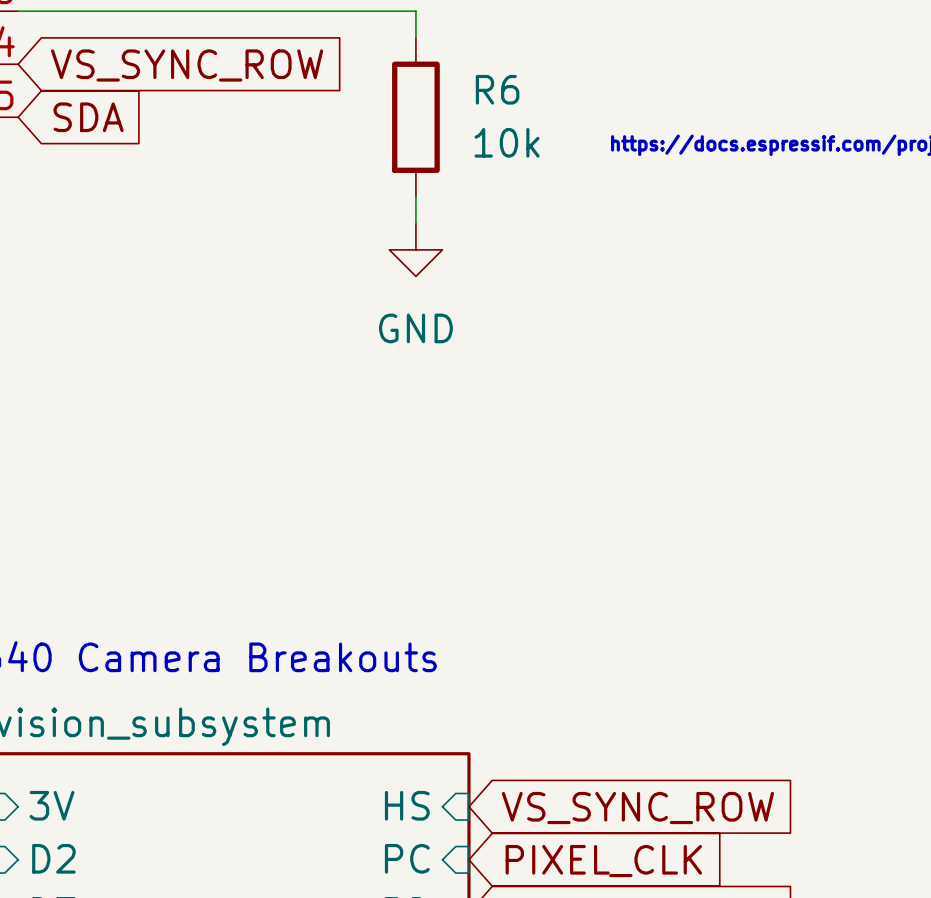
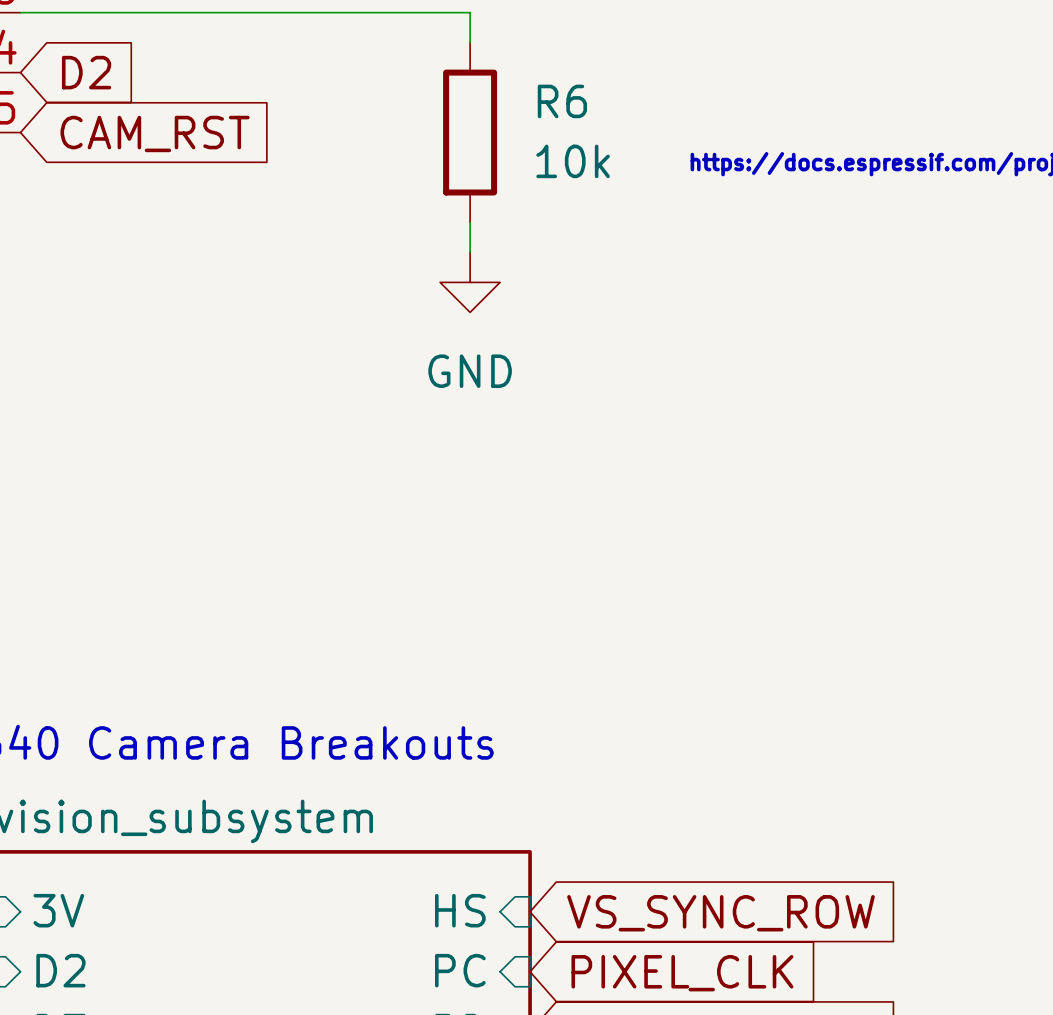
global label: VS_SYNC_ROW (187, 65) -> D2 (86, 72)
global label: SDA (88, 117) -> CAM_RST (155, 133)

